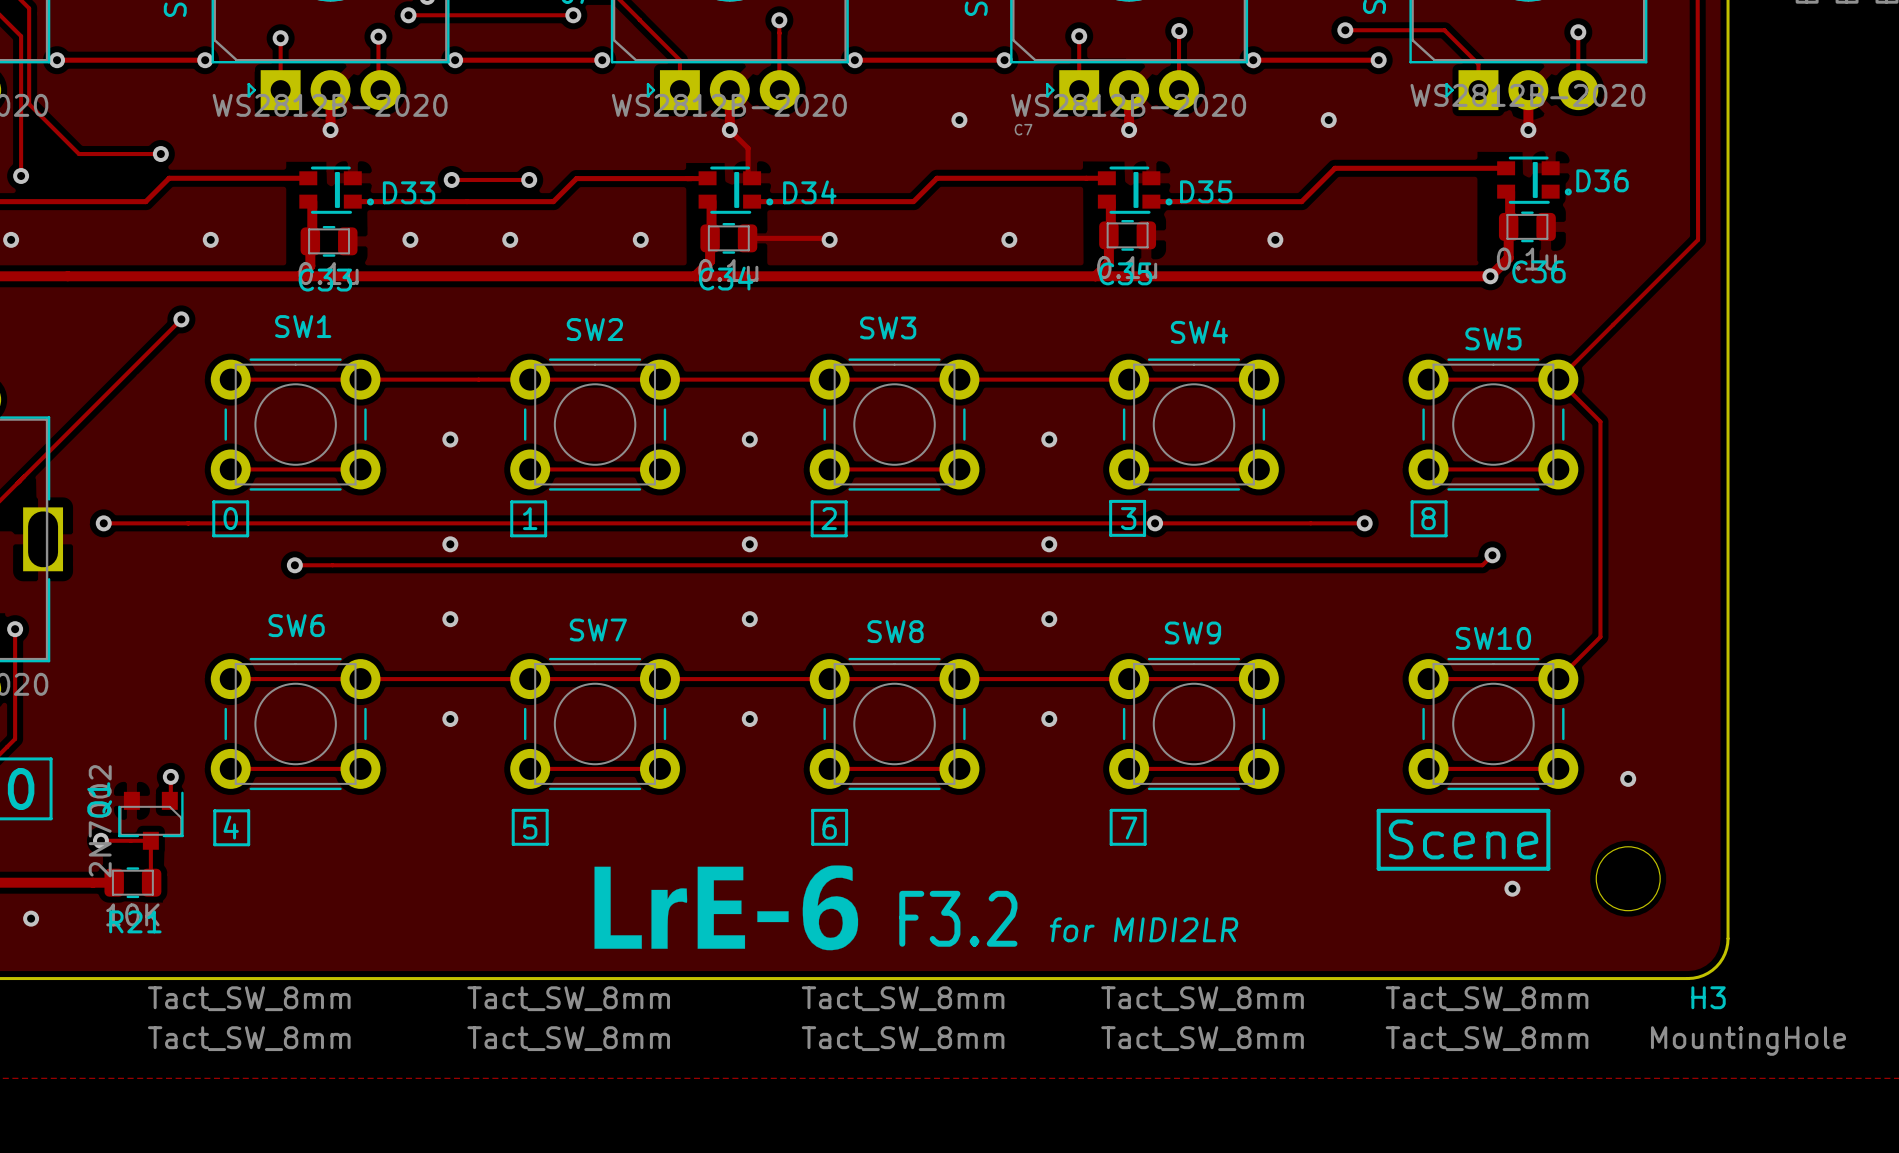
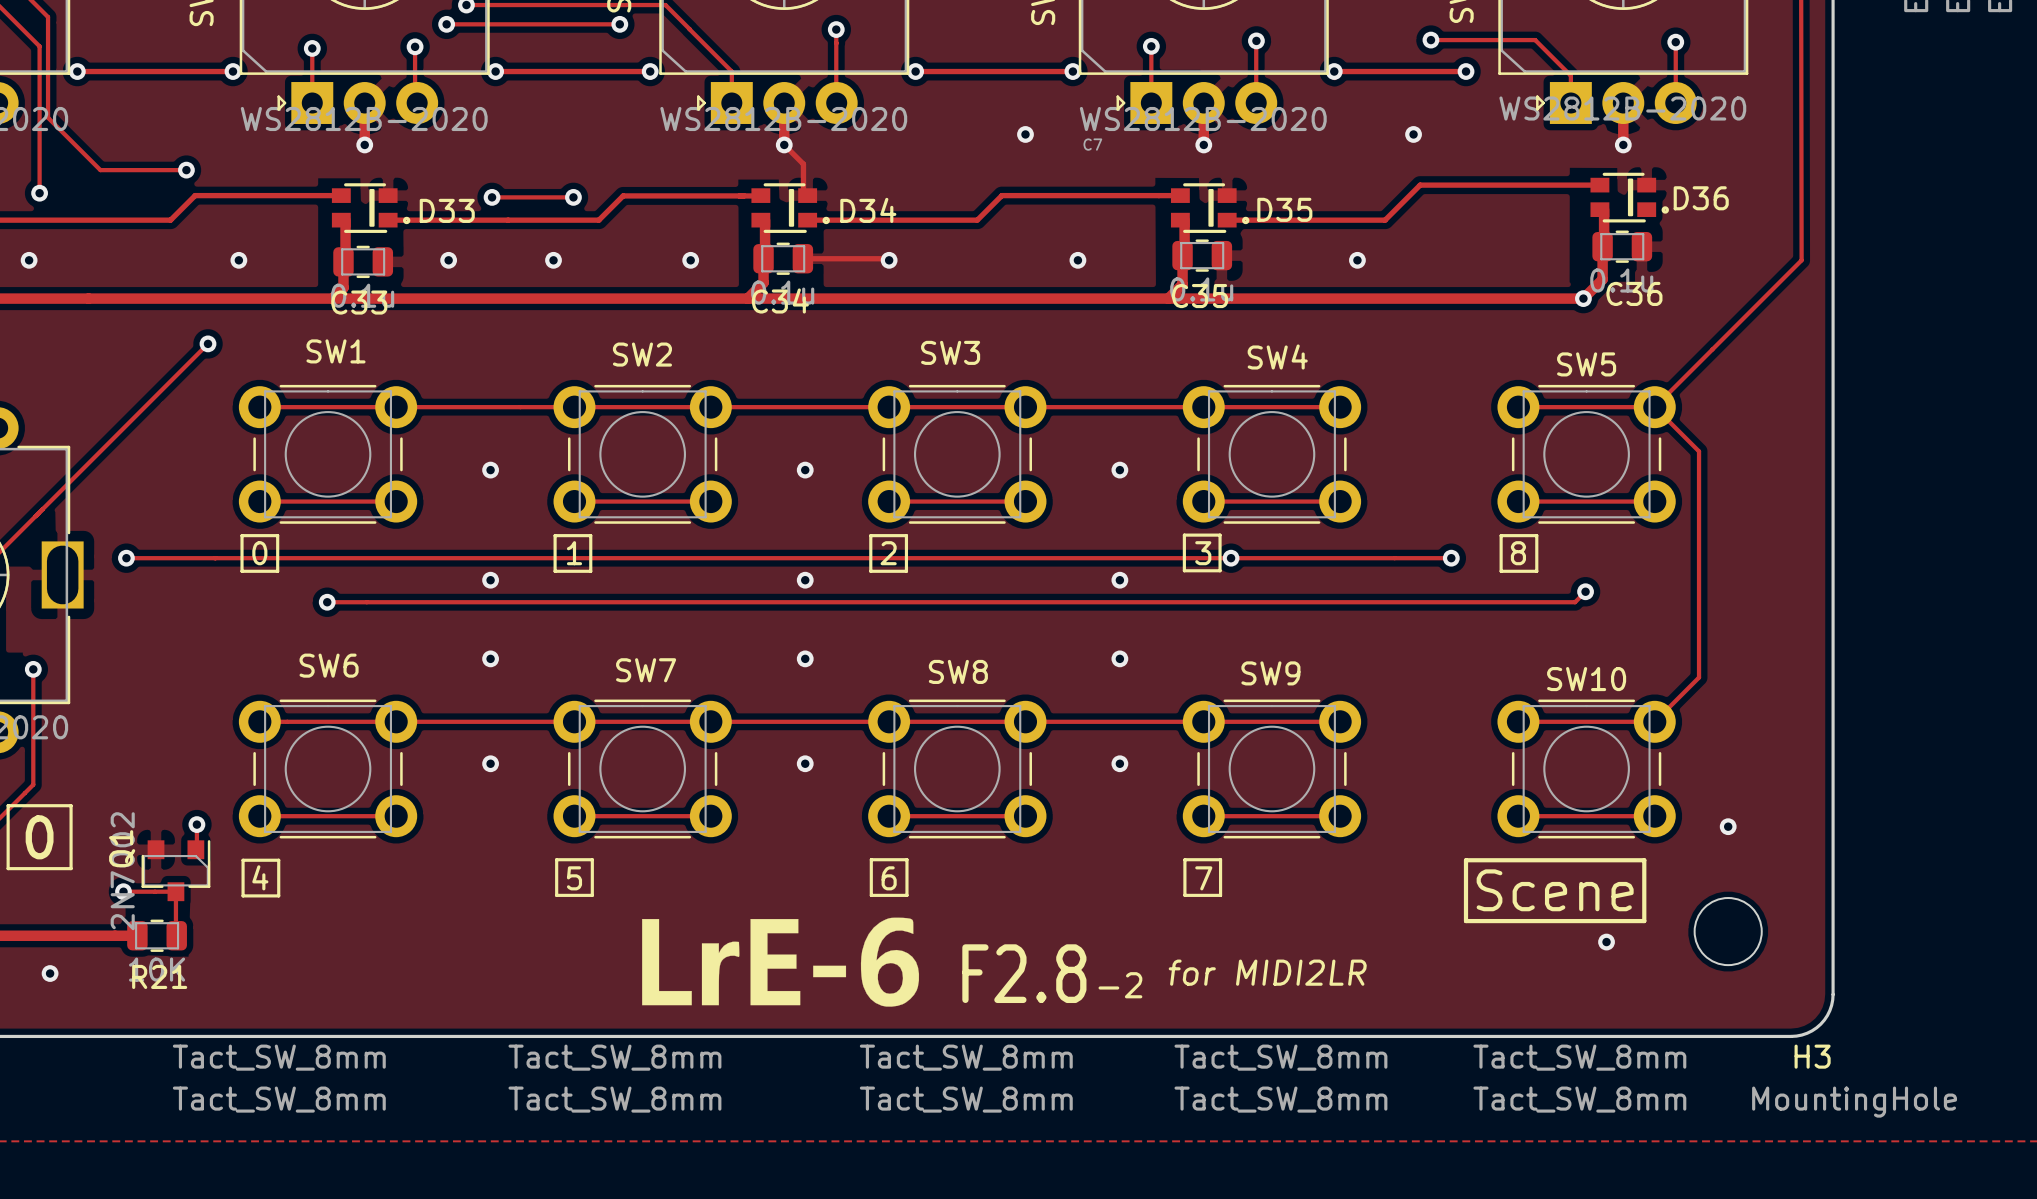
text: F3.2 (958, 918) -> F2.8 (1024, 973)
text: none -> -2 (1120, 985)
text position: for MIDI2LR (1144, 929) -> for MIDI2LR (1267, 972)

